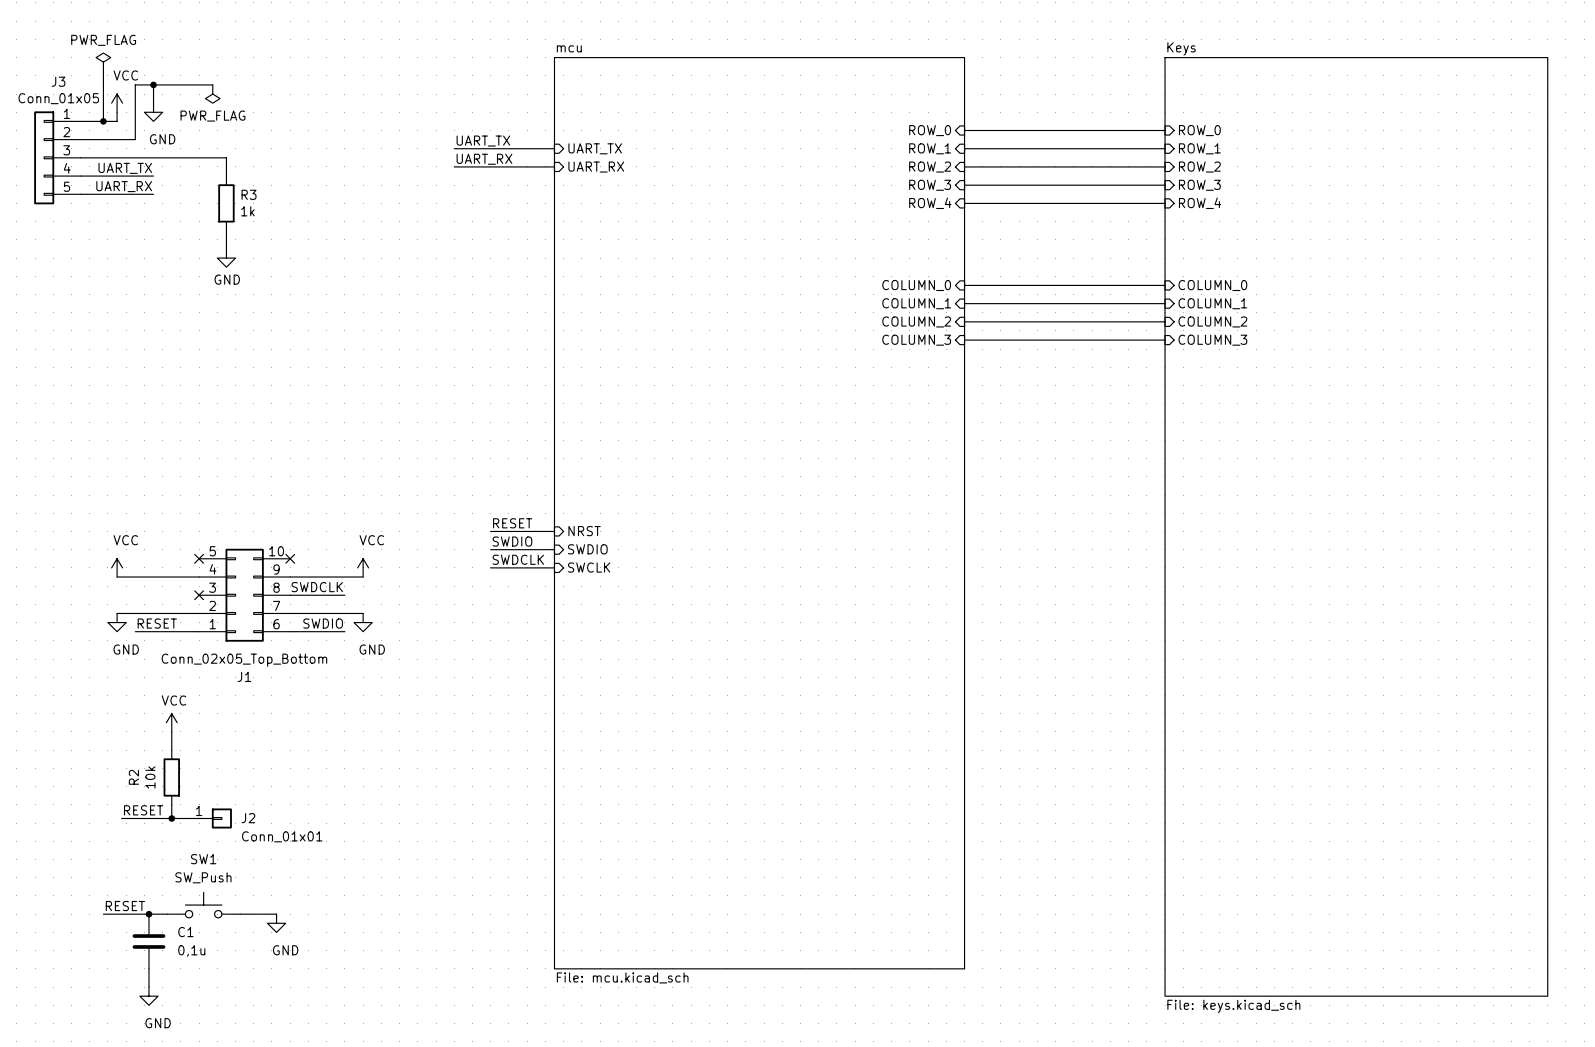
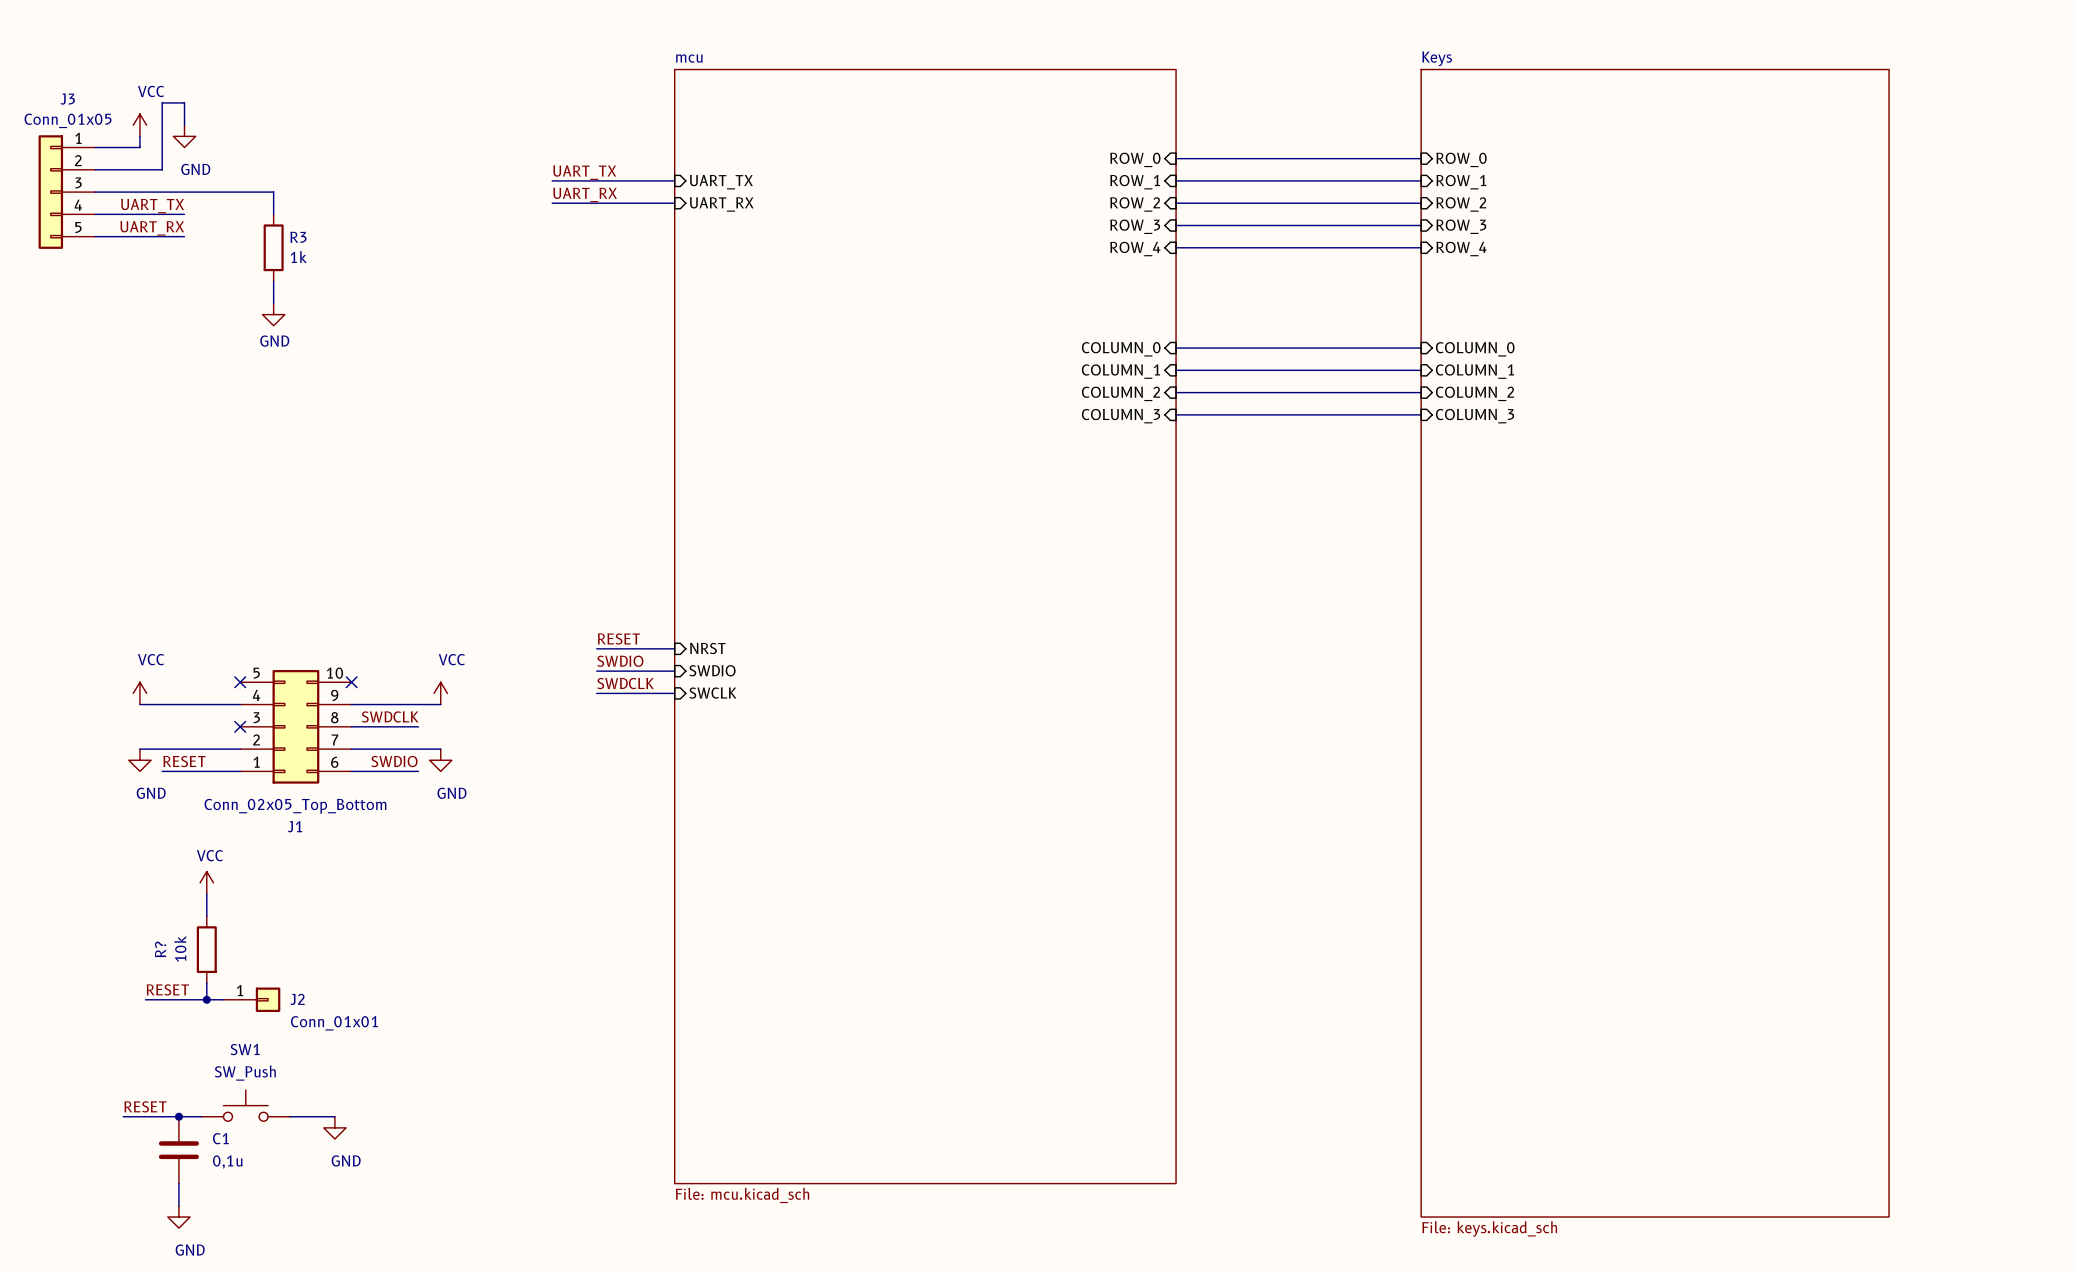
power symbol: PWR_FLAG (103, 62) -> none
wire: (103, 71) (103, 121) -> none
wire: (153, 84) (212, 84) -> none
junction: (153, 84) -> none
power symbol: PWR_FLAG (212, 94) -> none
junction: (103, 121) -> none
R2 name: R2 (133, 777) -> R? (160, 949)

